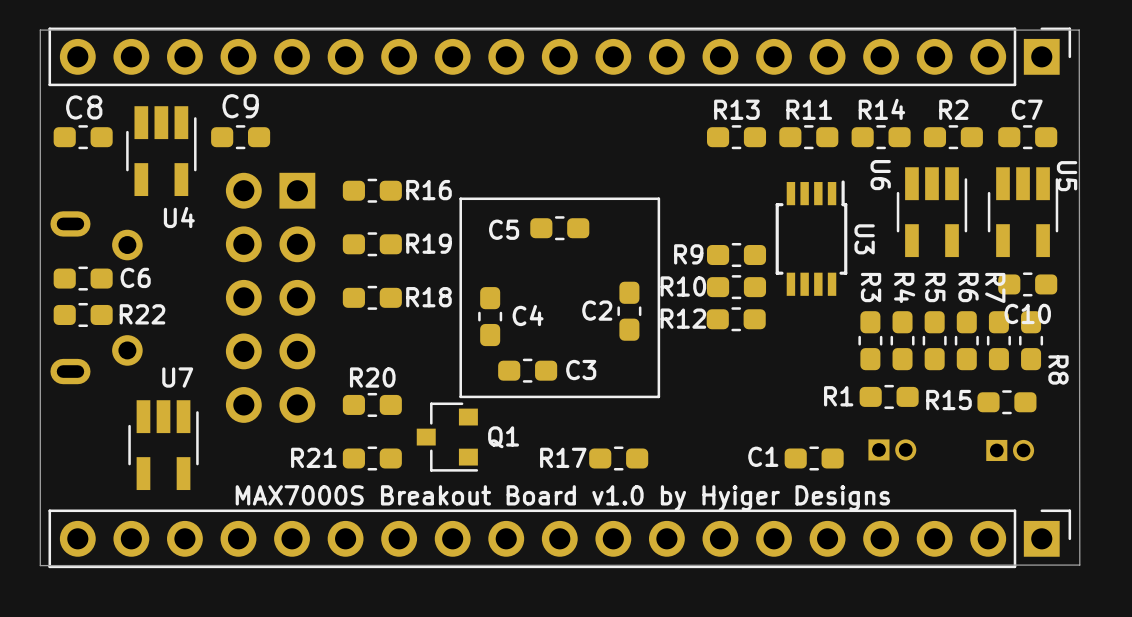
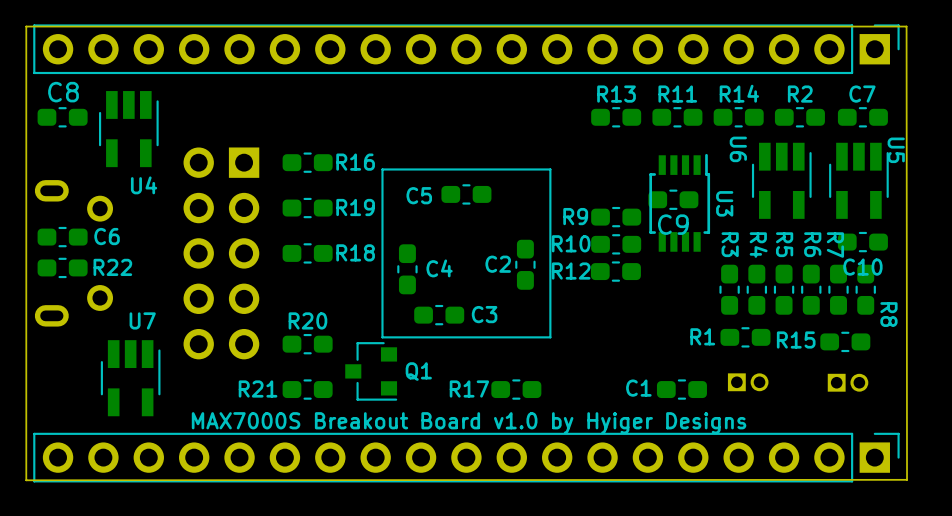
C9 name position: C9 (240, 106) -> C9 (673, 224)
C9 position: (240, 137) -> (673, 199)

